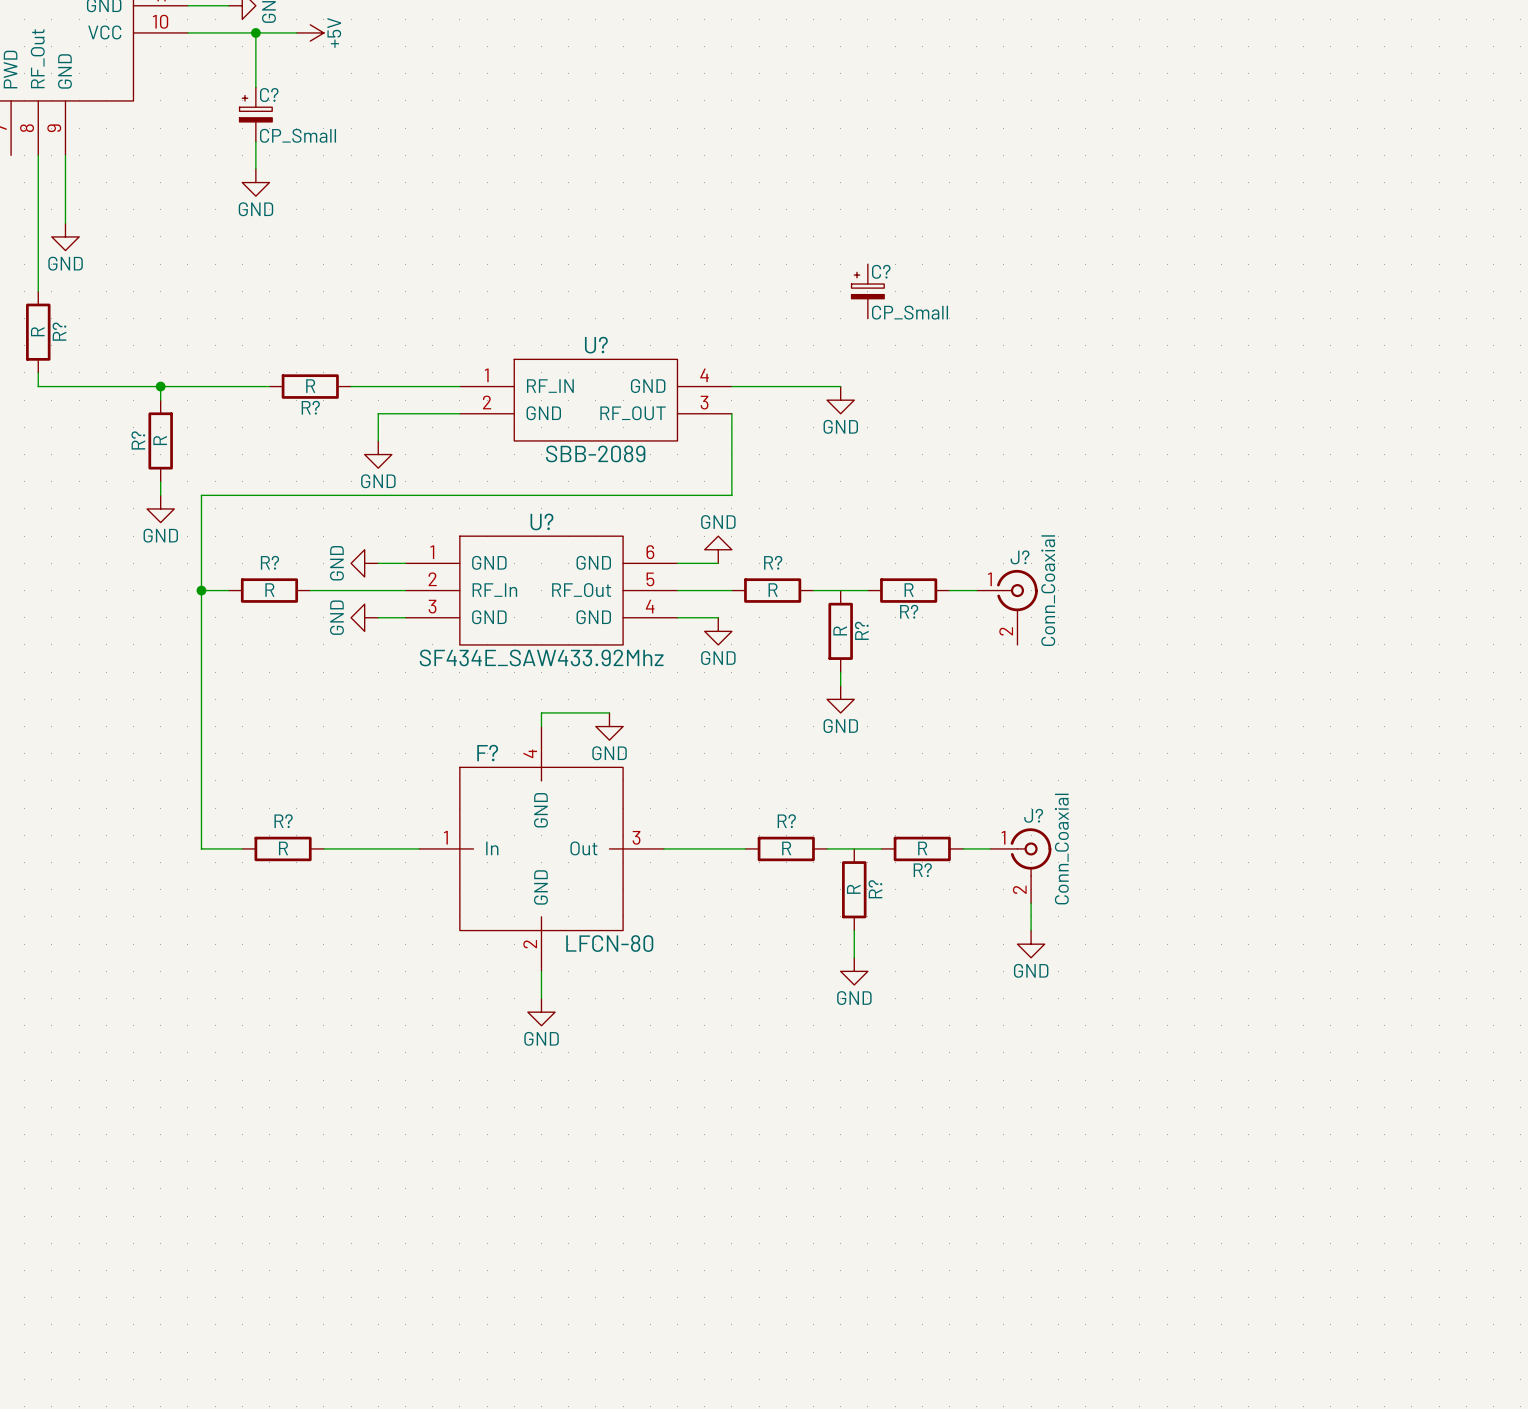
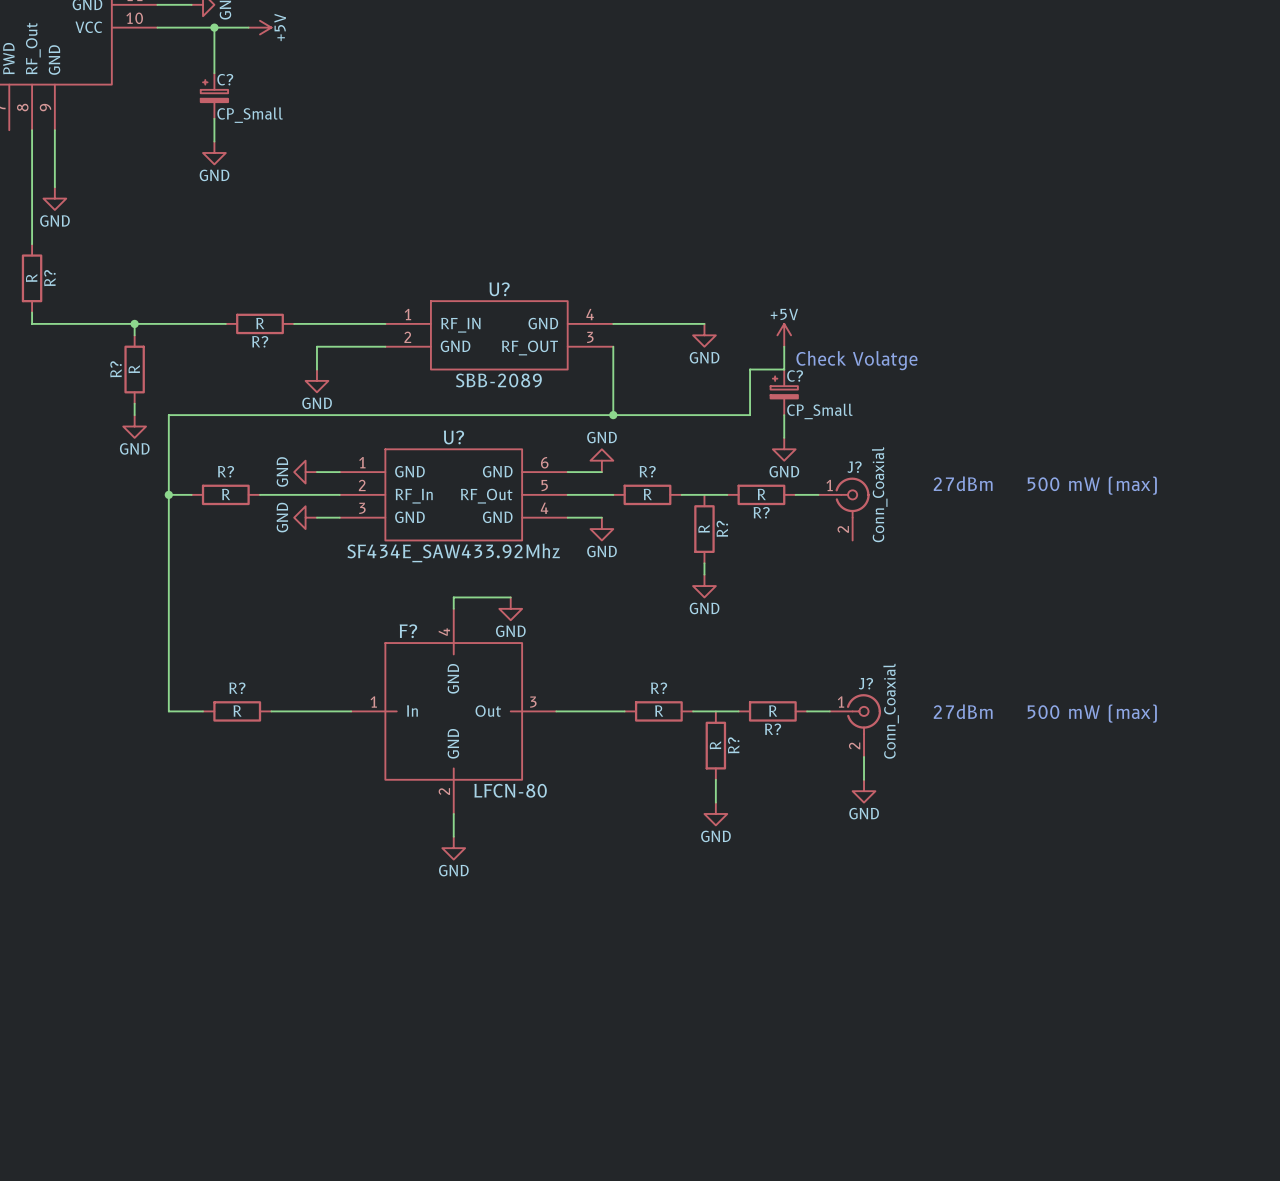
C? position: (867, 291) -> (784, 392)
power symbol: none -> +5V (784, 335)
wire: none -> (784, 346) (784, 369) (750, 369) (750, 415) (613, 415)
text: none -> Check Volatge (856, 360)
junction: none -> (613, 415)
wire: none -> (784, 415) (784, 437)
power symbol: none -> GND (784, 449)
text: none -> 27dBm 500 mW (max) (1045, 485)
text: none -> 27dBm 500 mW (max) (1045, 713)

